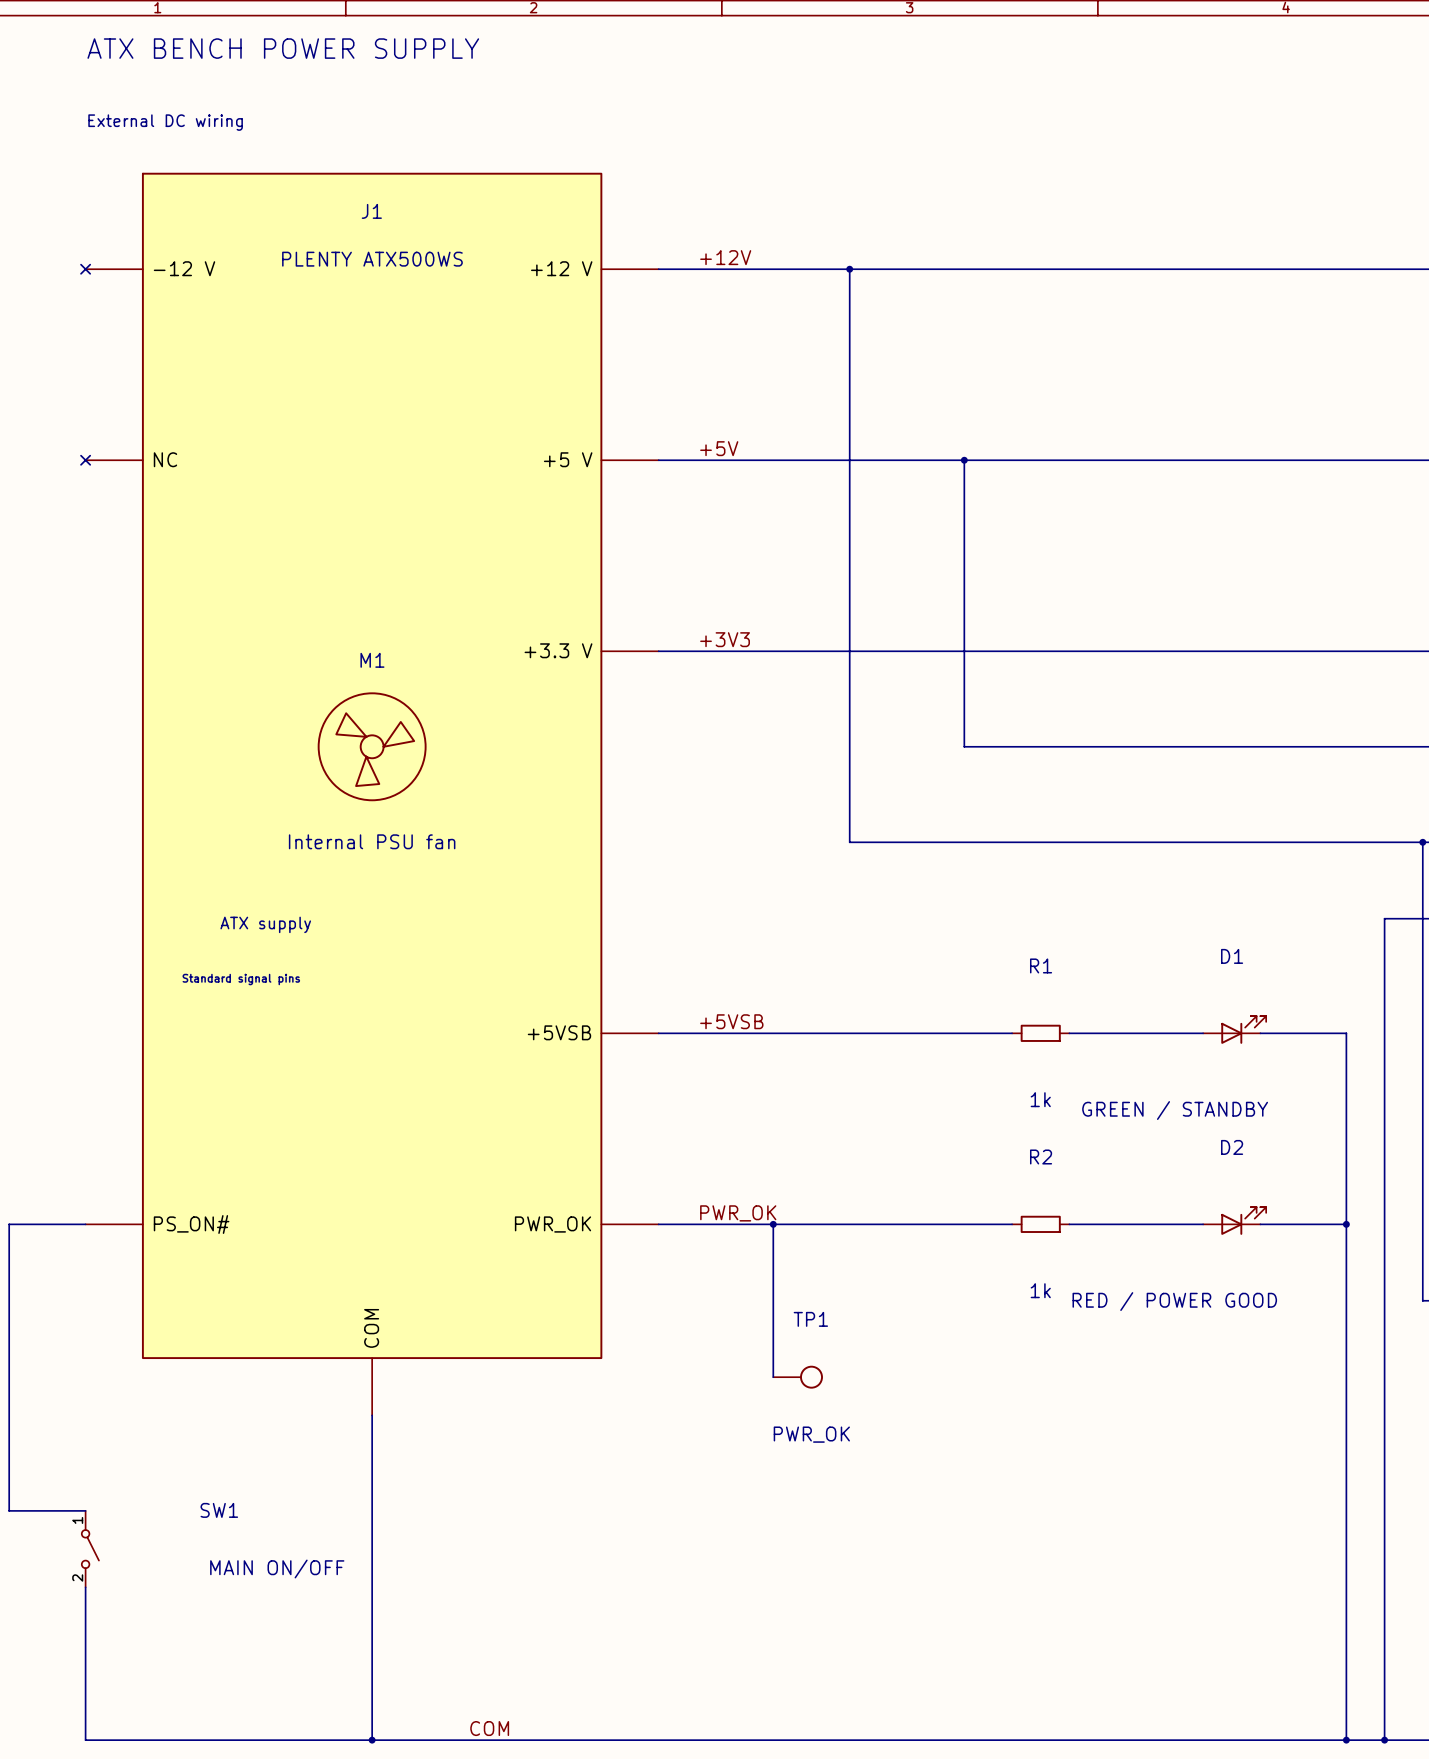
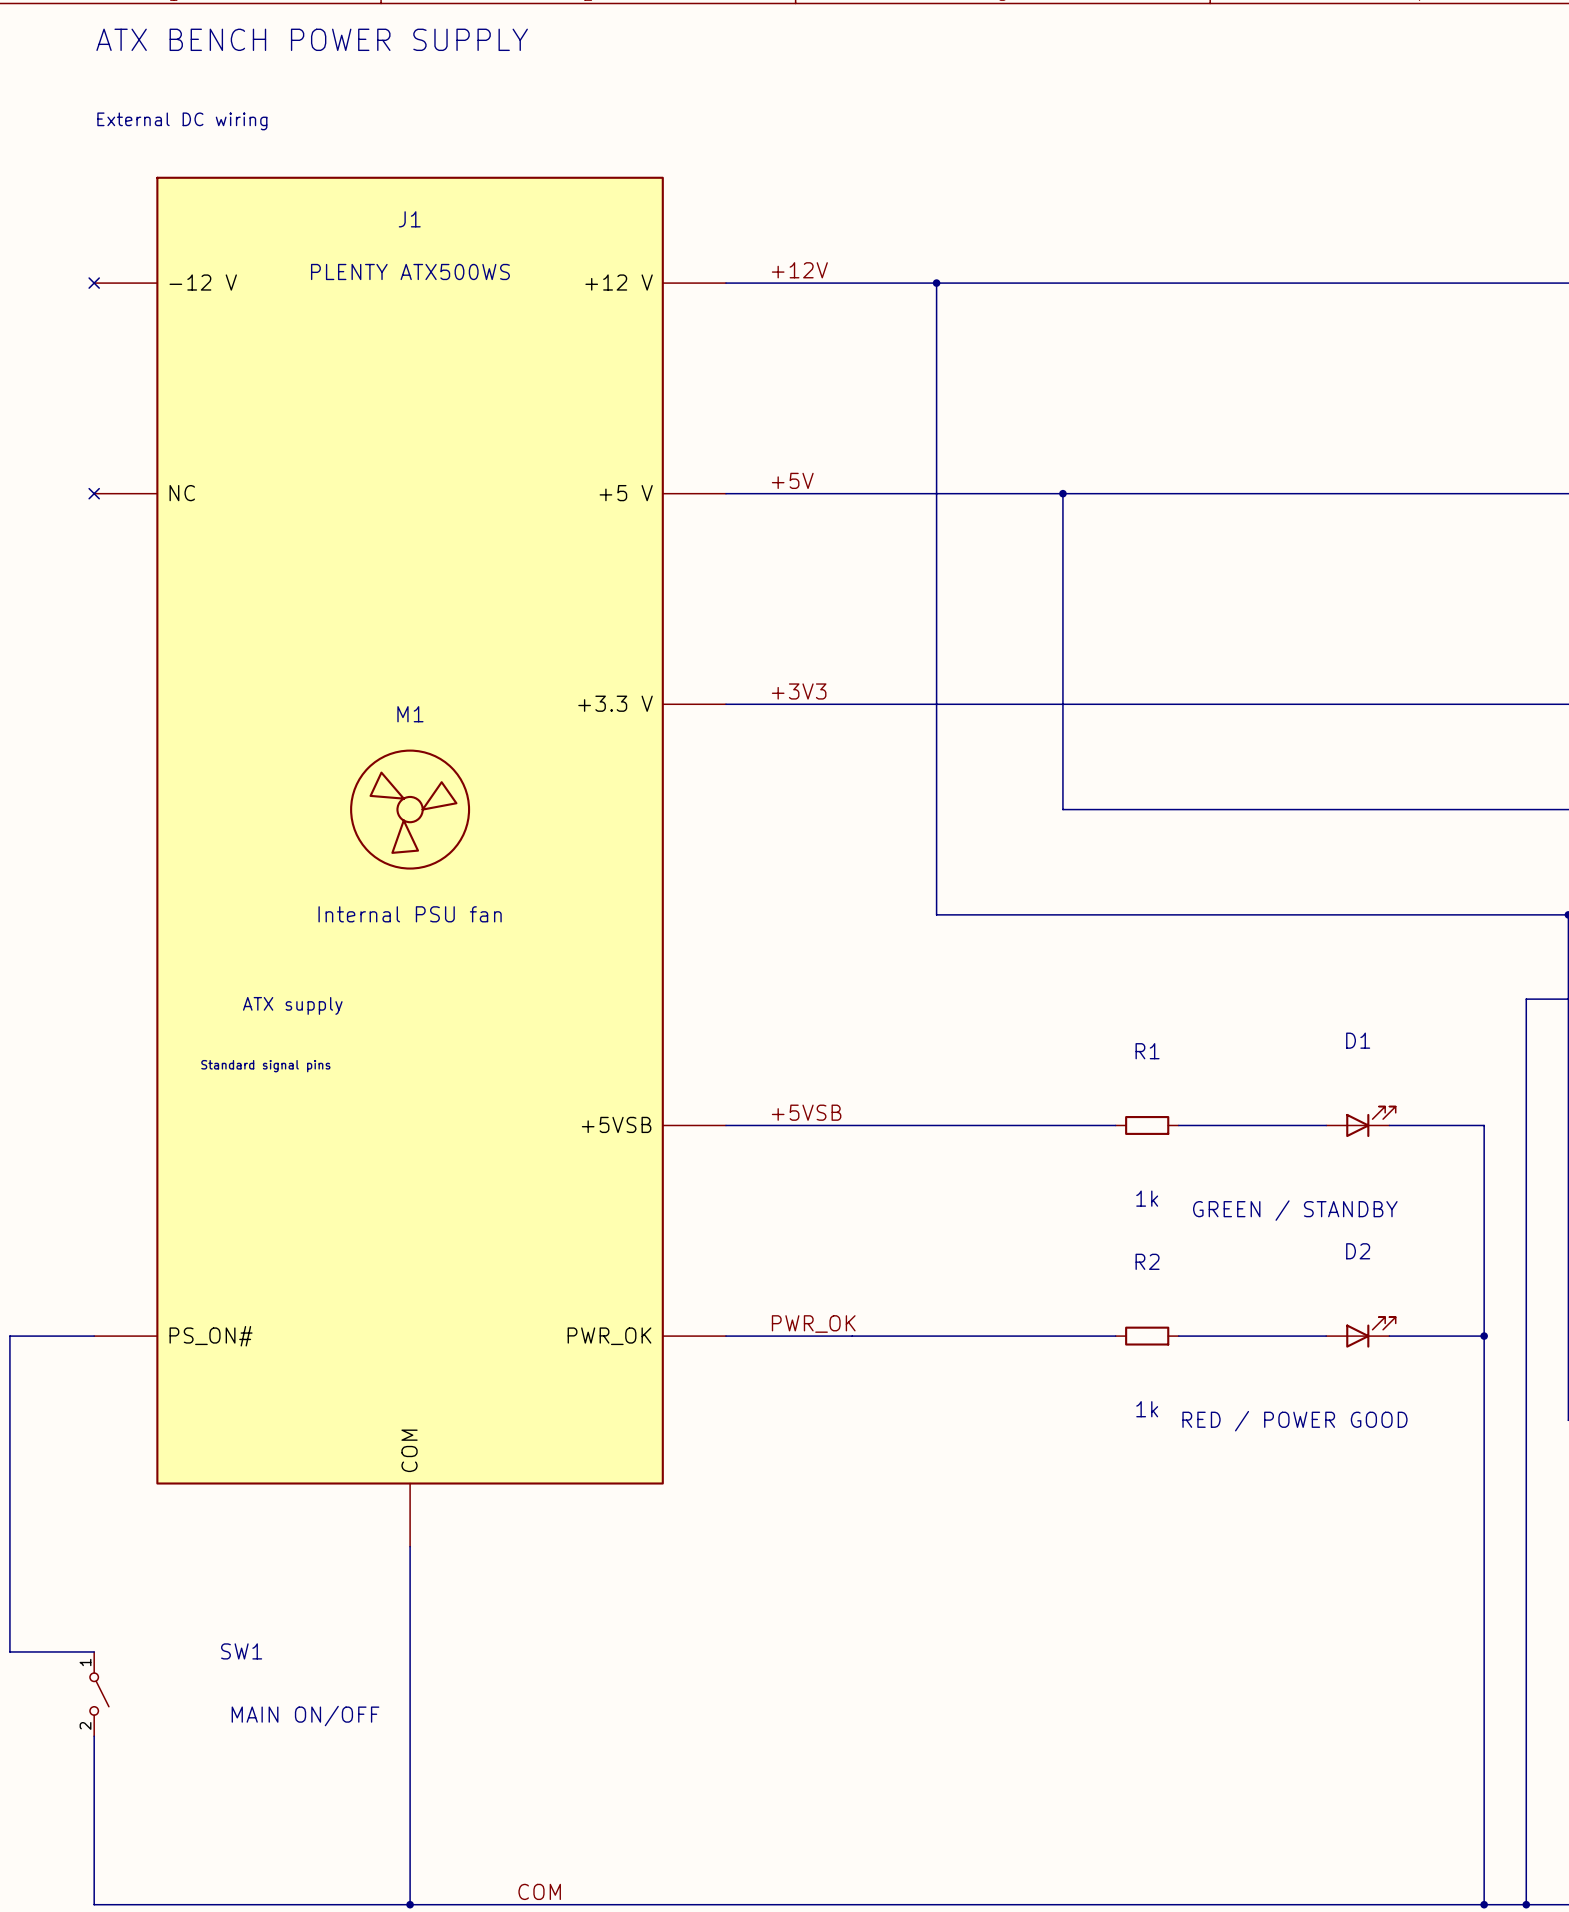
wire: (773, 1224) (773, 1377) -> none
junction: (773, 1224) -> none
TP1: PWR_OK (798, 1377) -> none

